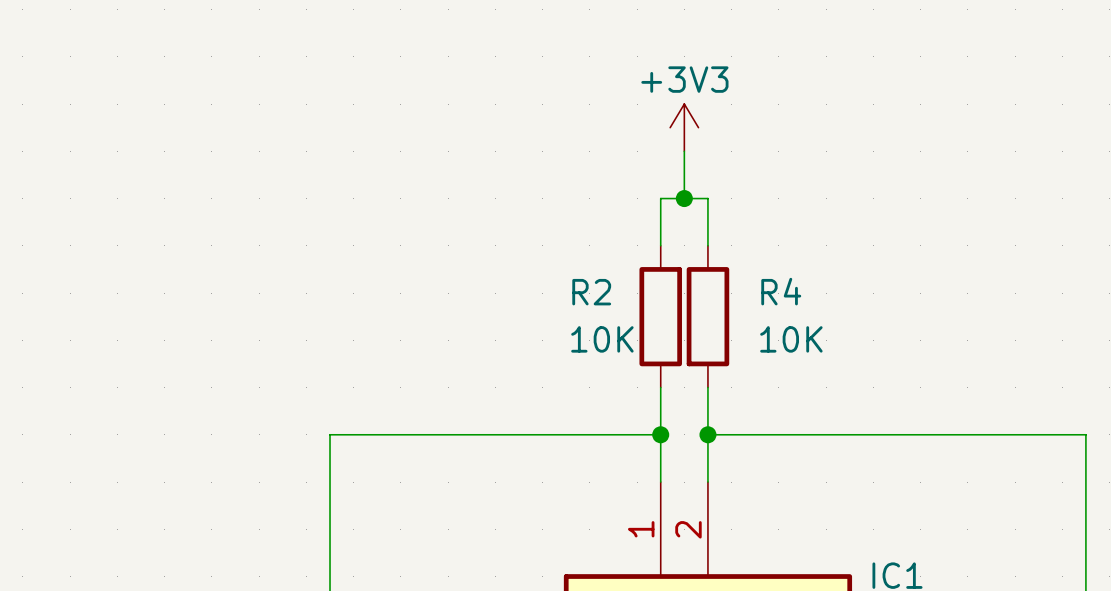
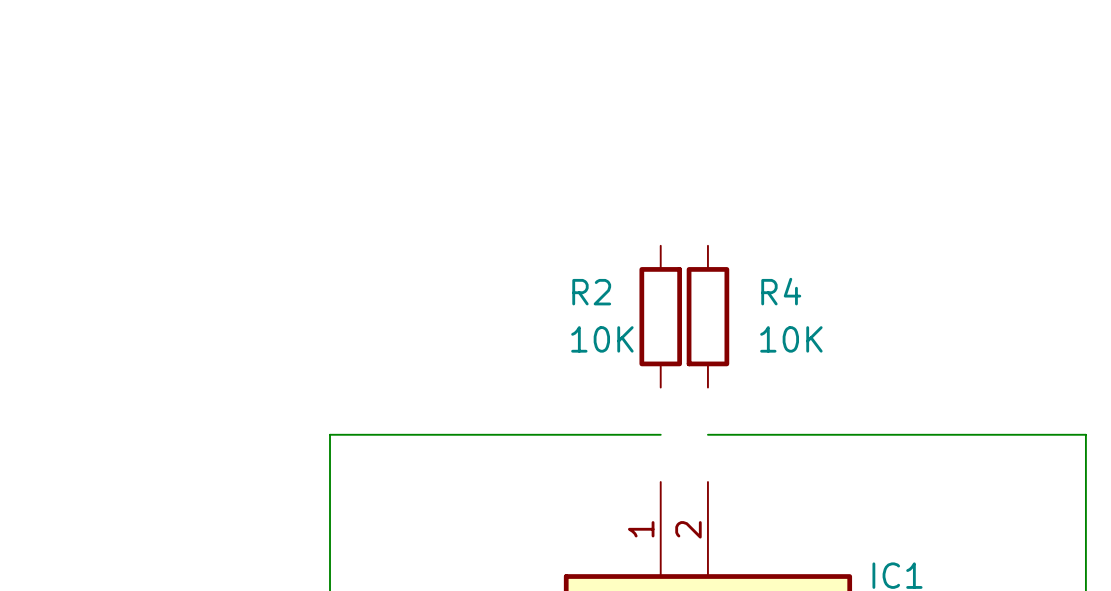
power symbol: +3V3 (684, 127) -> none
wire: (684, 151) (684, 198) -> none
junction: (684, 198) -> none
wire: (660, 245) (660, 198) (707, 198) (707, 245) -> none
wire: (660, 387) (660, 482) -> none
wire: (707, 387) (707, 482) -> none
junction: (660, 434) -> none
junction: (707, 434) -> none

